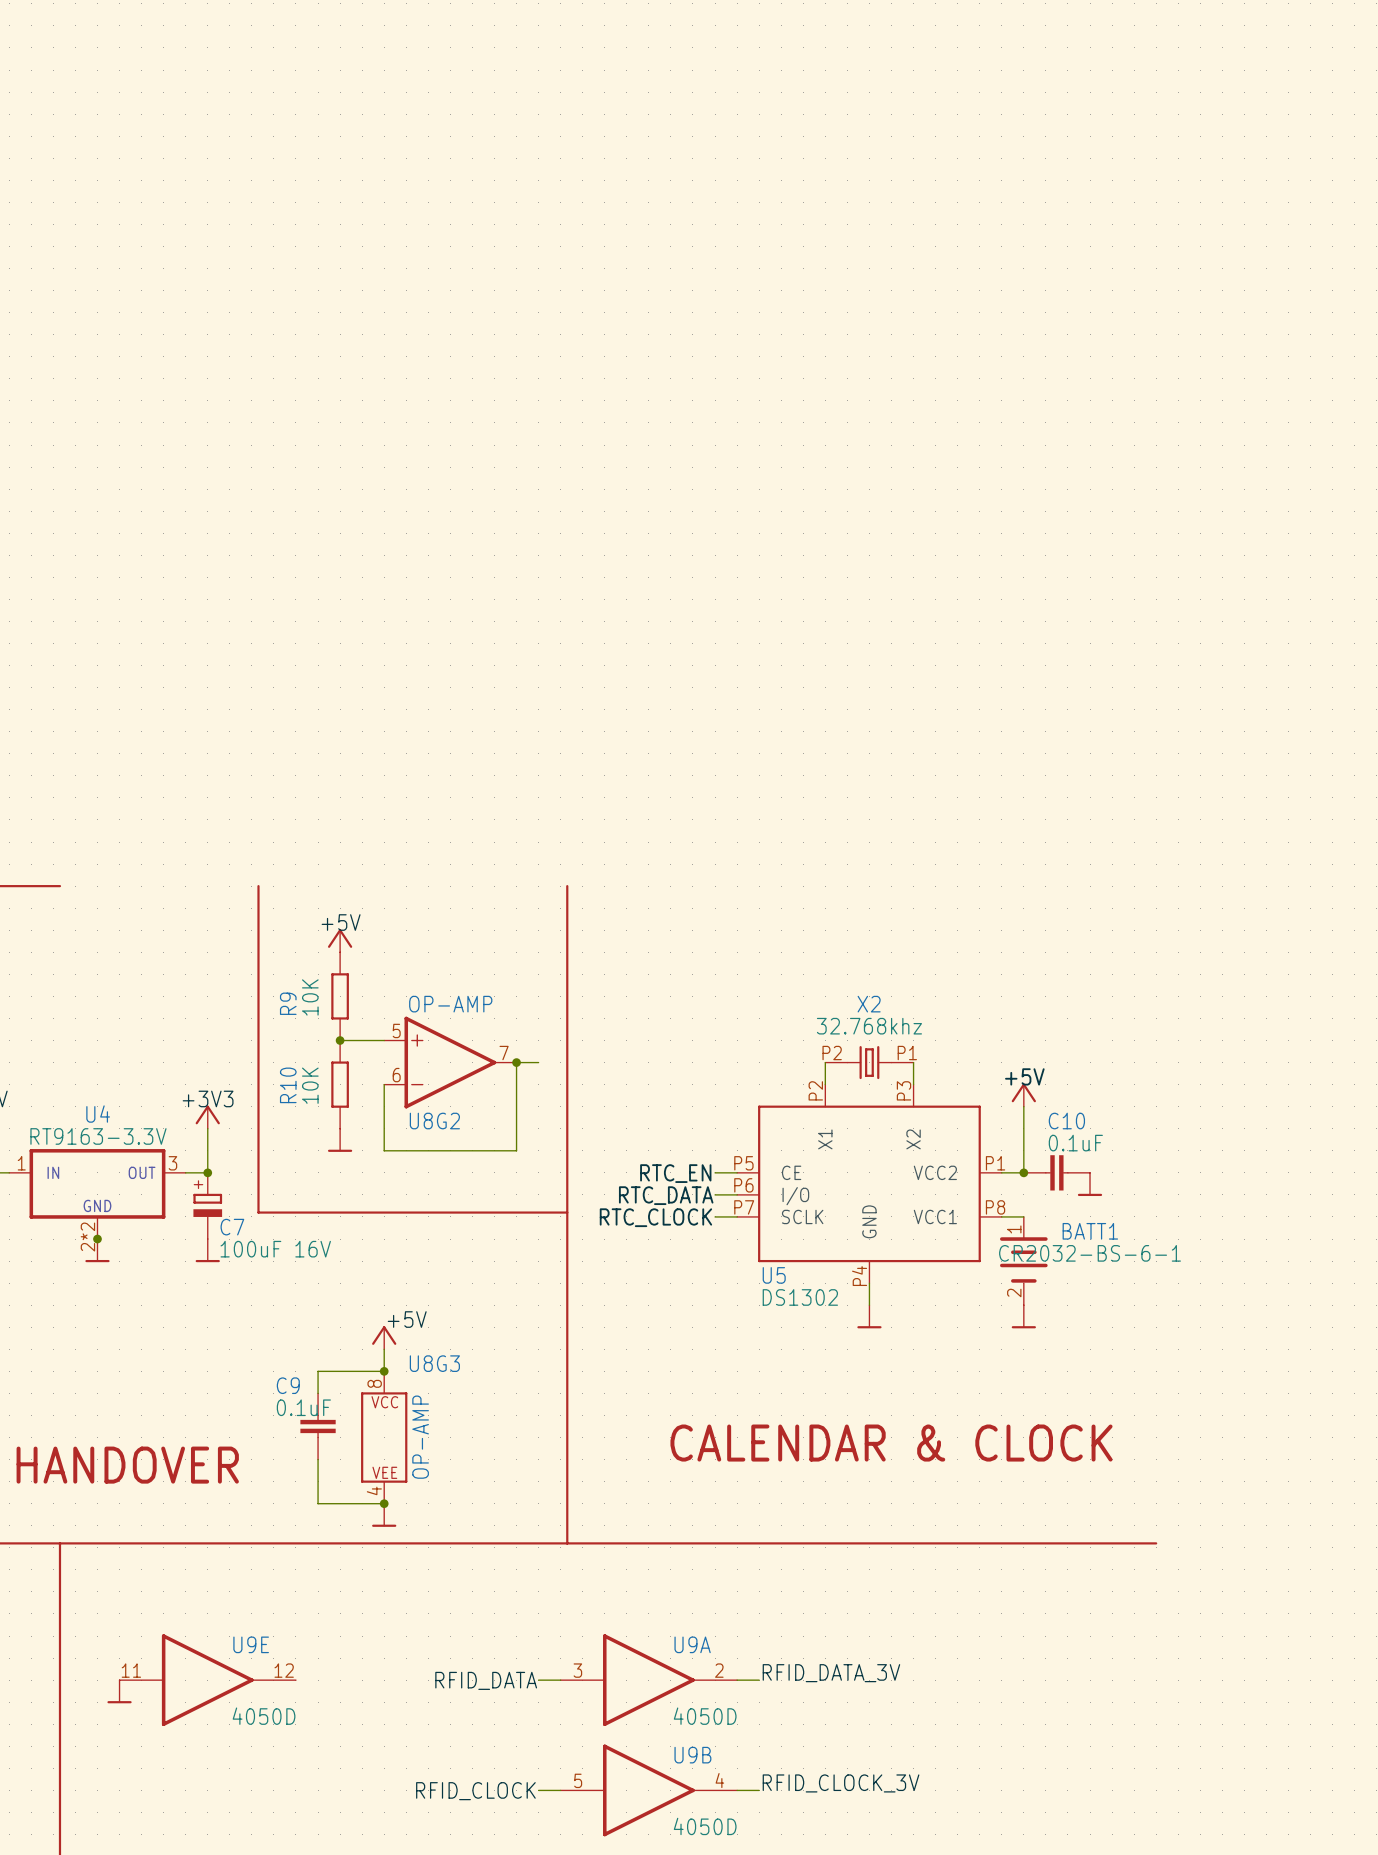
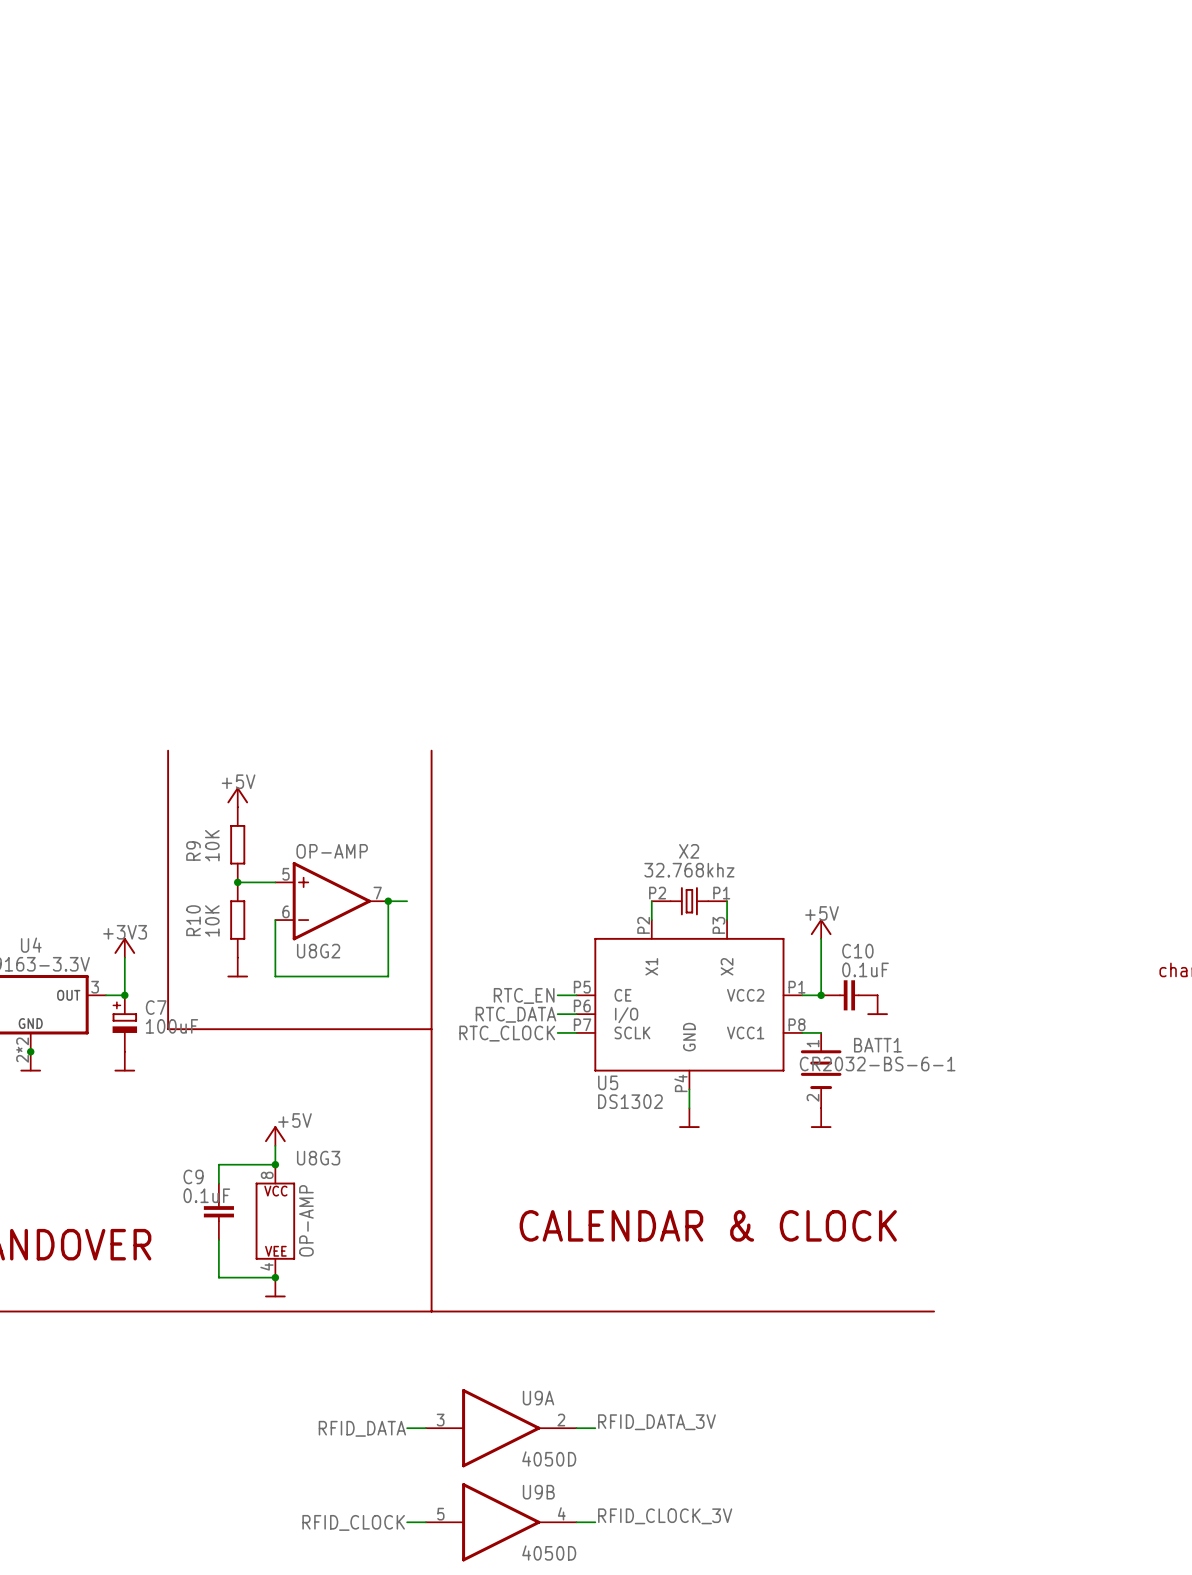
C7 name position: C7 (232, 1227) -> C7 (156, 1007)
C7 value: 100uF 16V (275, 1249) -> 100uF (171, 1026)
U9E: 4050D (207, 1680) -> none
power symbol: (119, 1691) -> none

